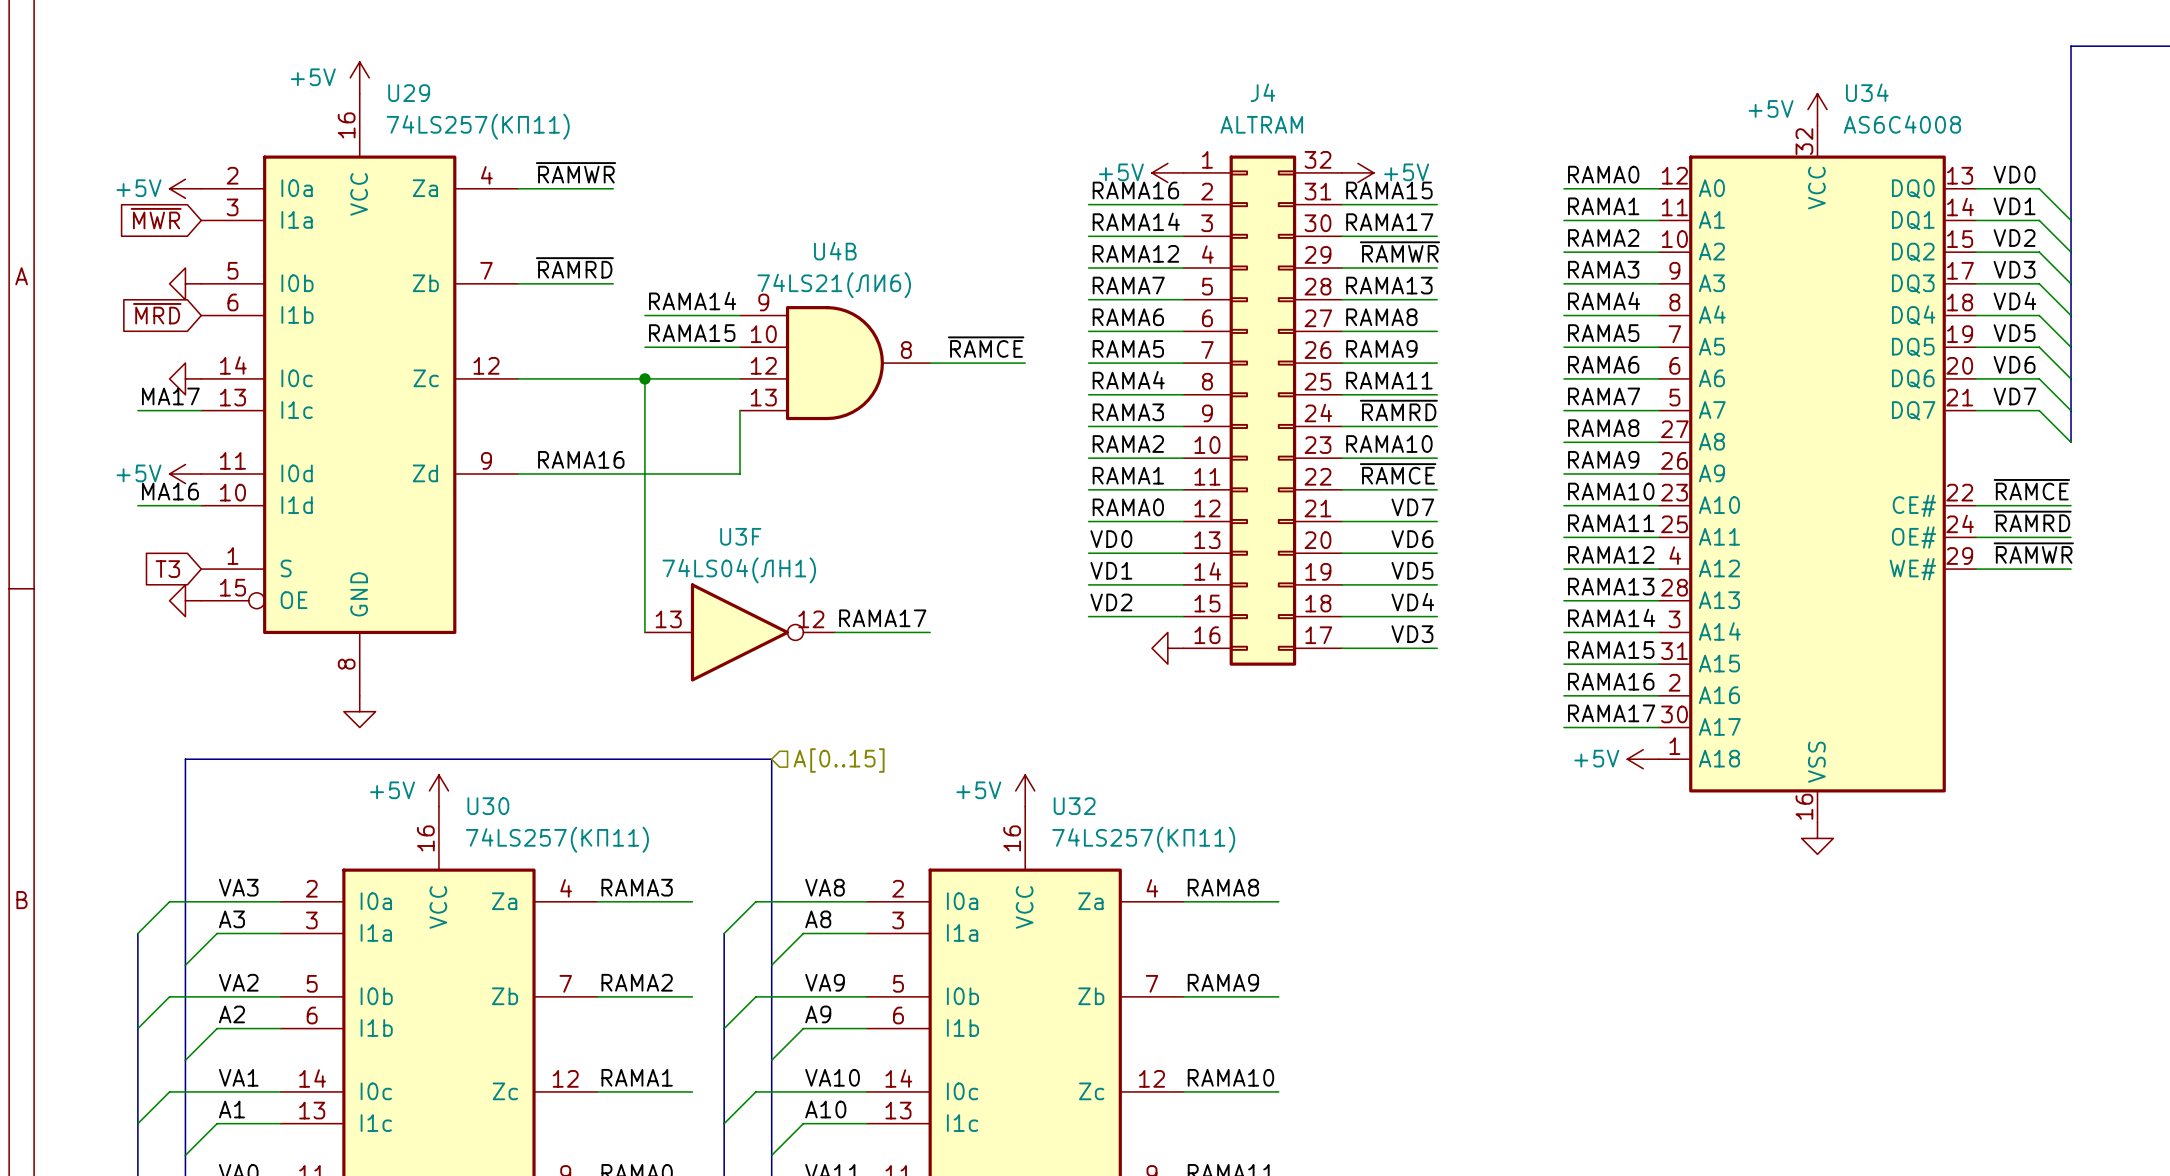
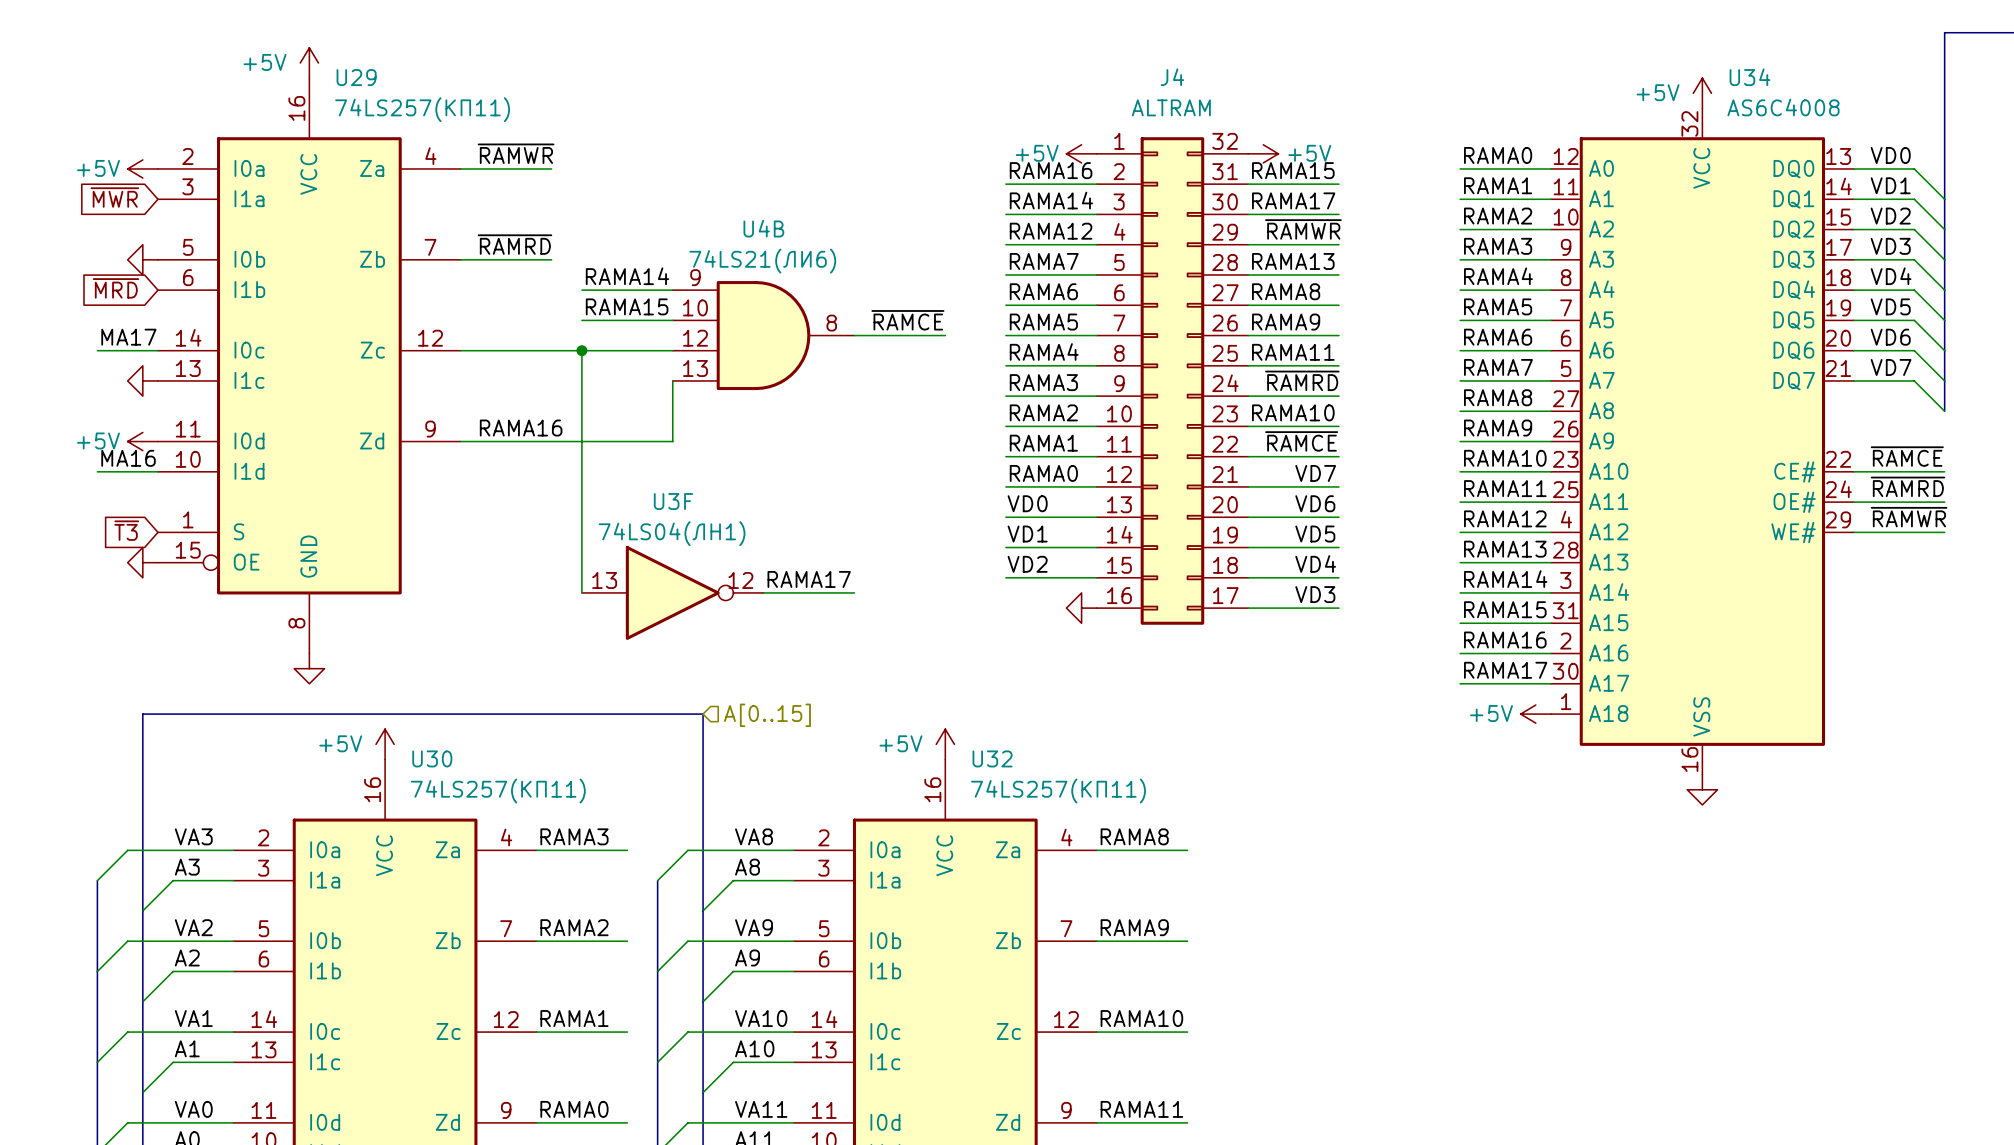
power symbol position: (185, 378) -> (142, 380)
label position: MA17 (170, 396) -> MA17 (128, 337)
wire: (137, 410) (201, 410) -> (97, 350) (157, 350)
global label: T3 (167, 569) -> ~{T3} (126, 530)

